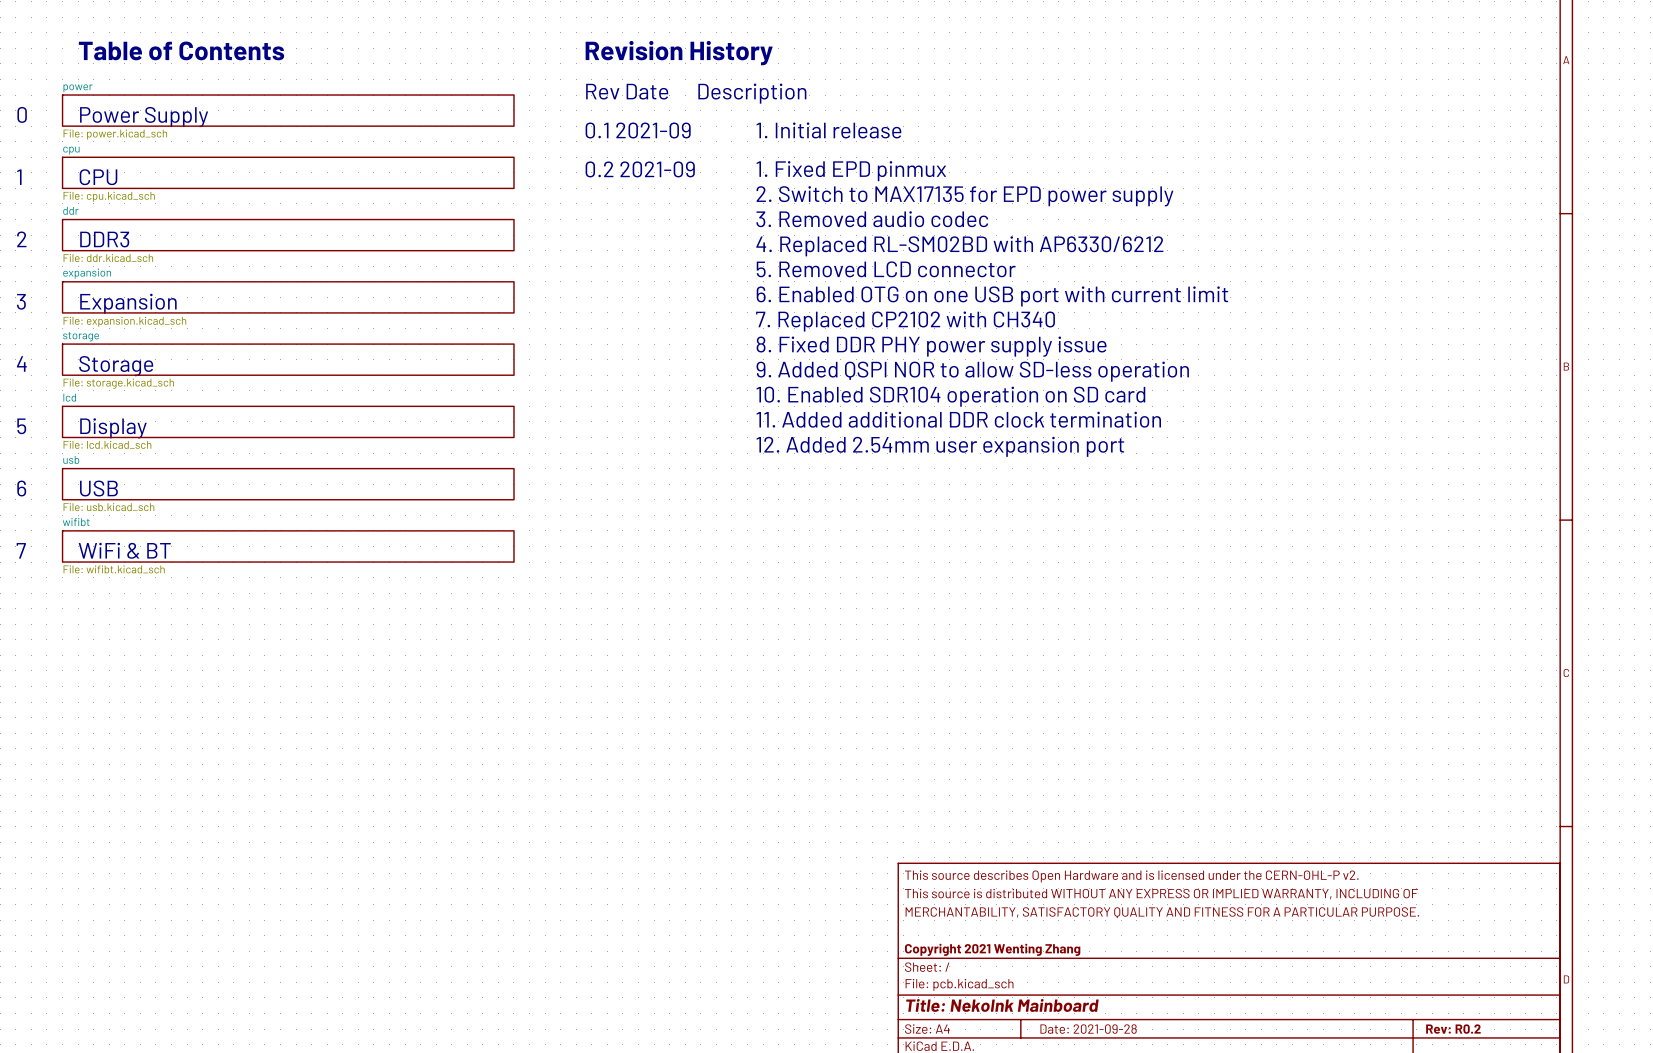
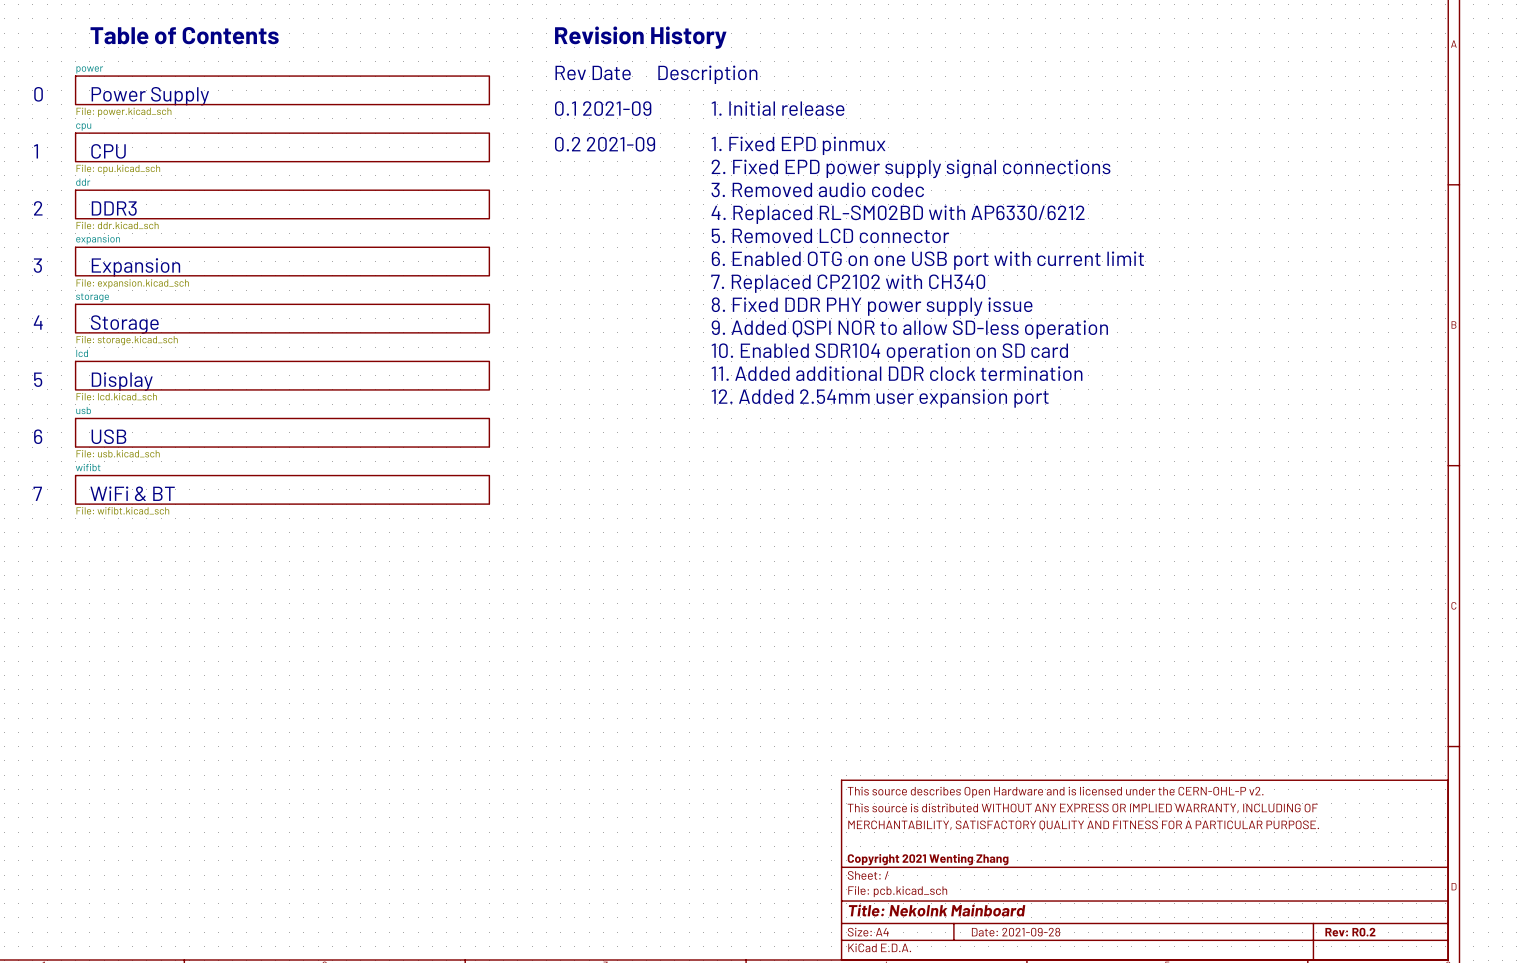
text: 2. Switch to MAX17135 for EPD power supply (964, 196) -> 2. Fixed EPD power supply signal connections (911, 168)

